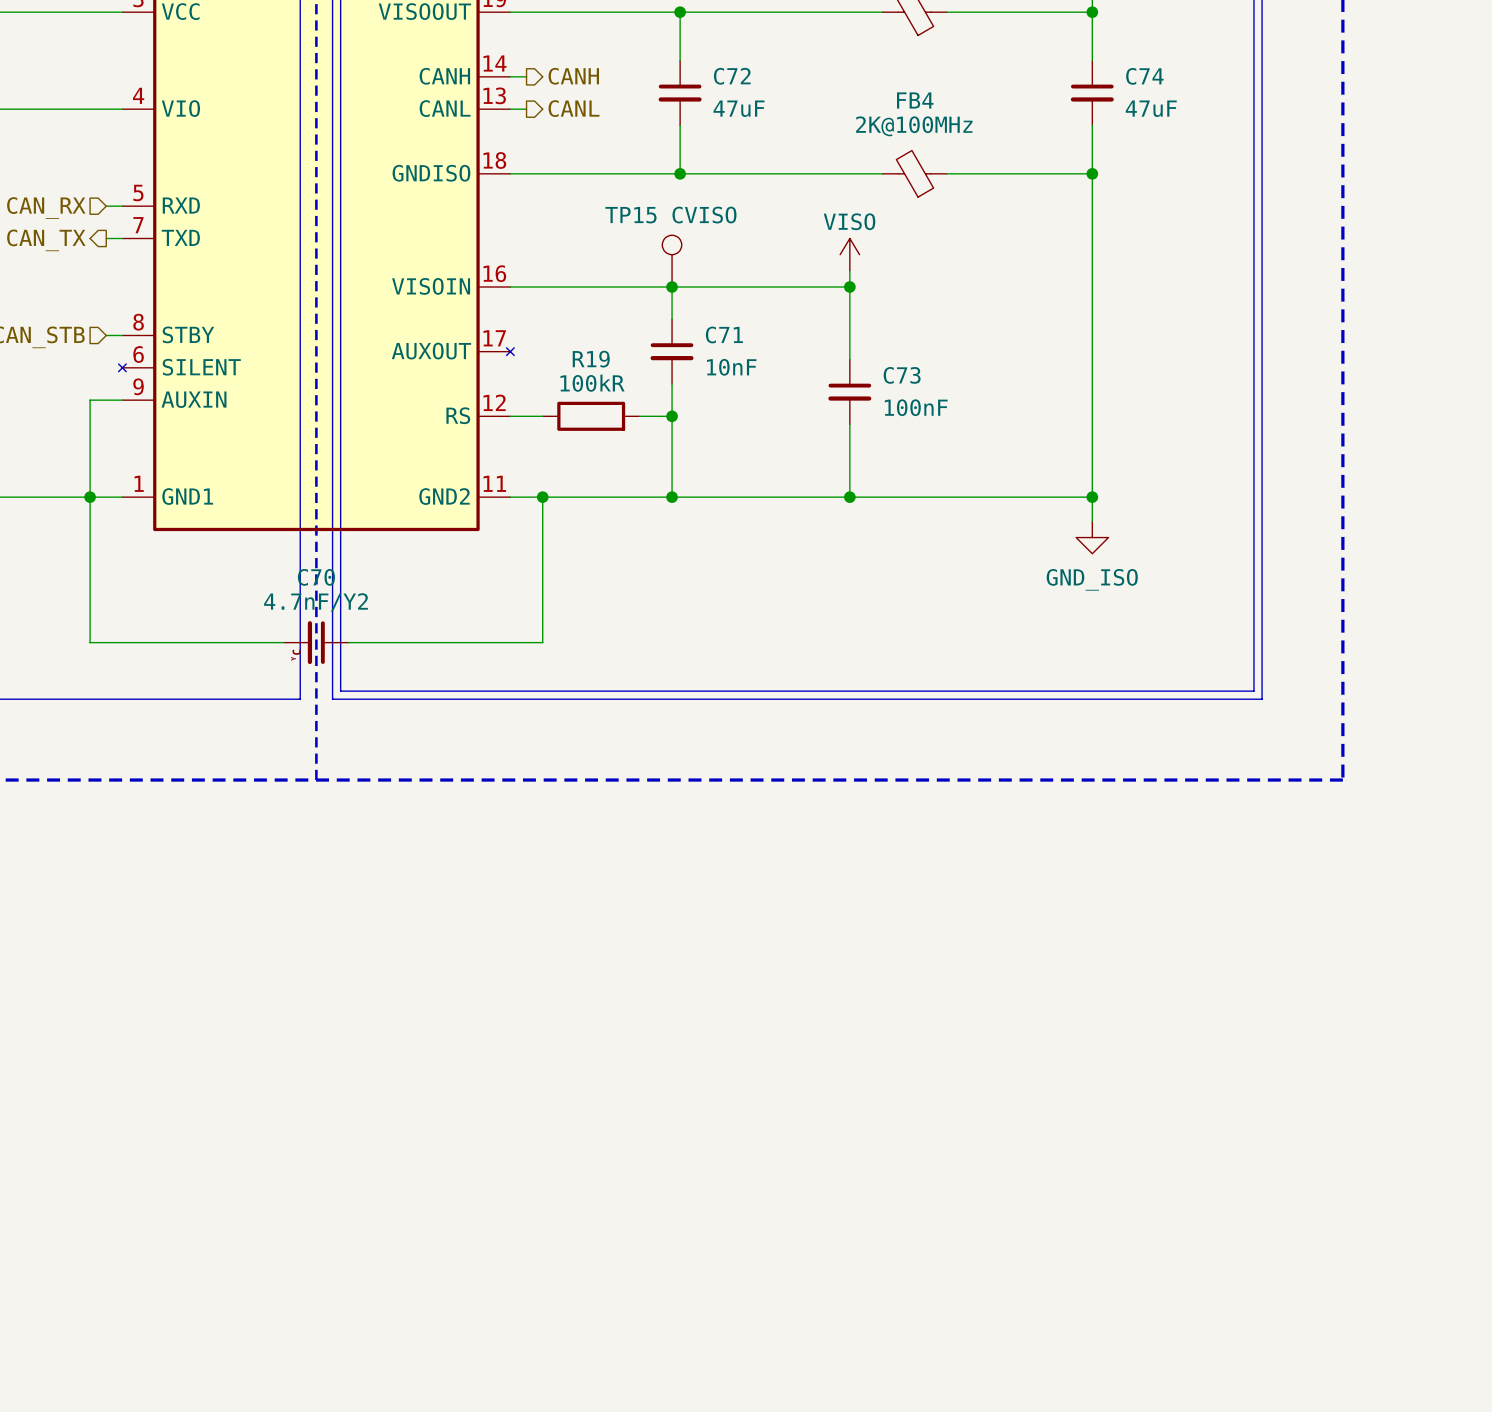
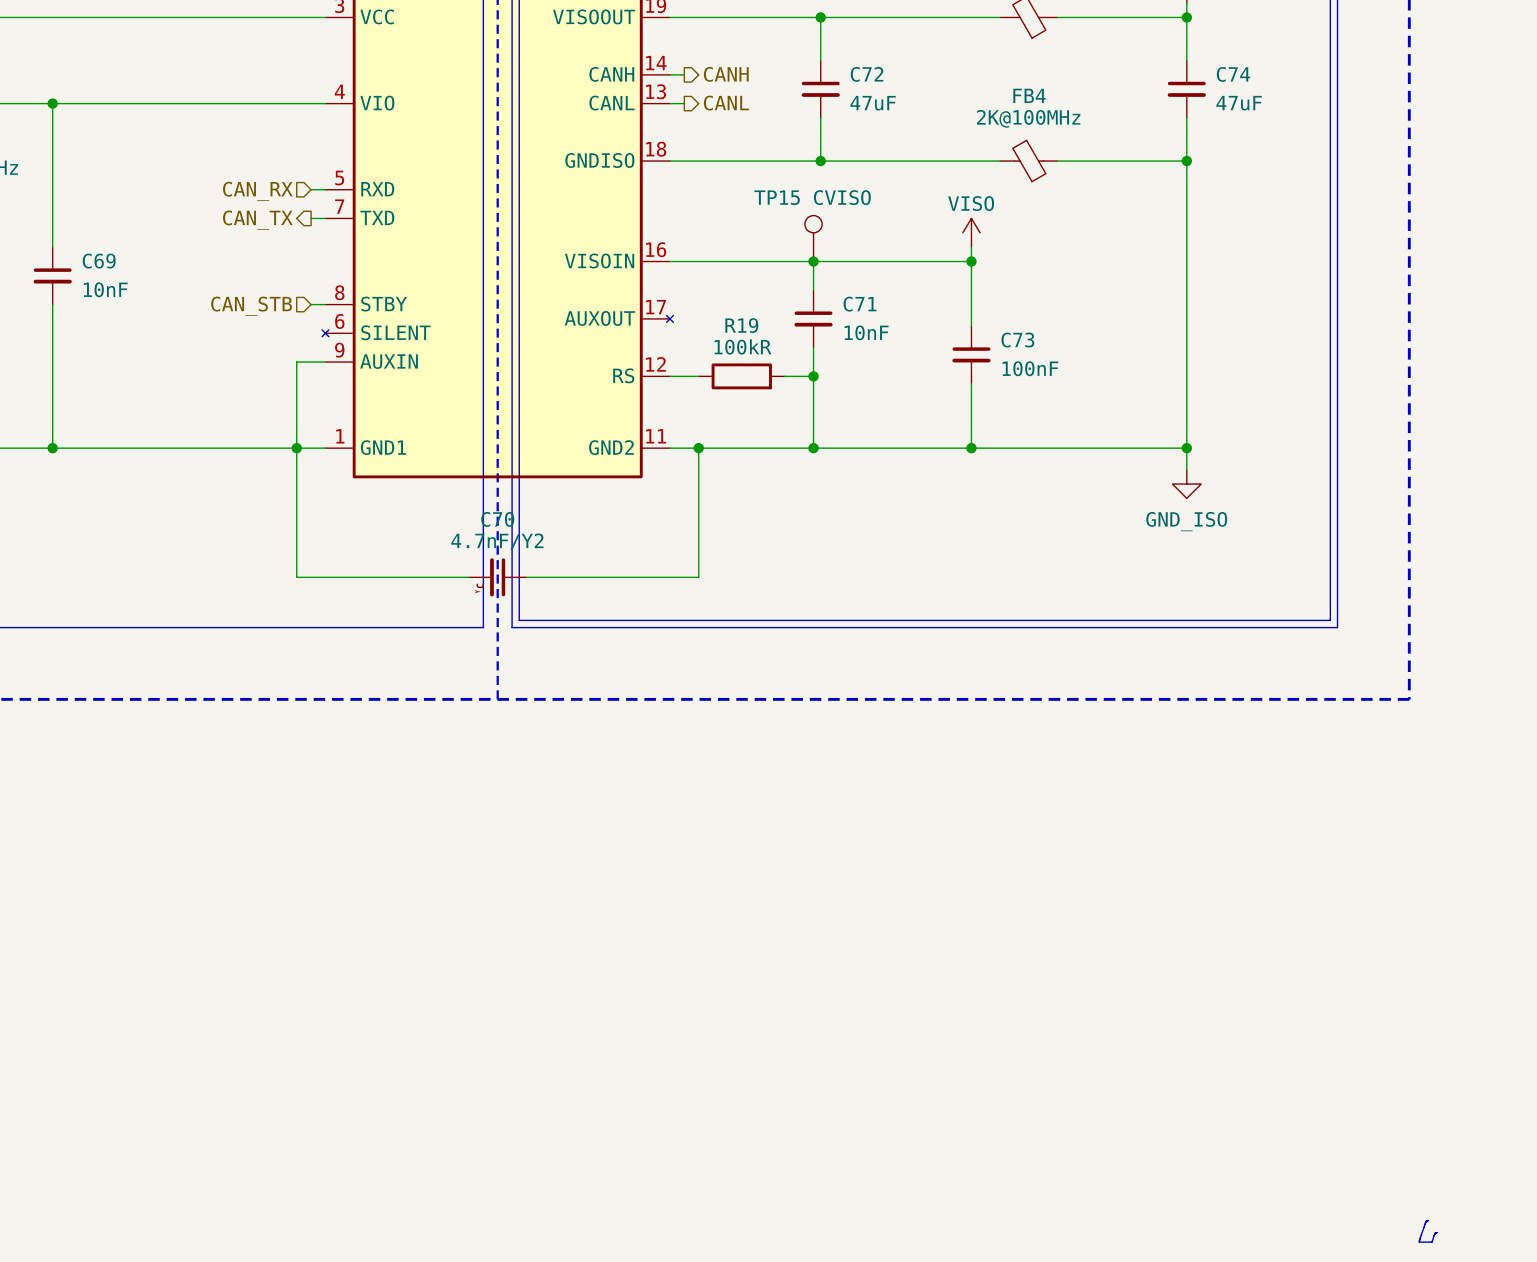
line: none -> (1426, 1221) (1419, 1242) (1432, 1242) (1434, 1234)

